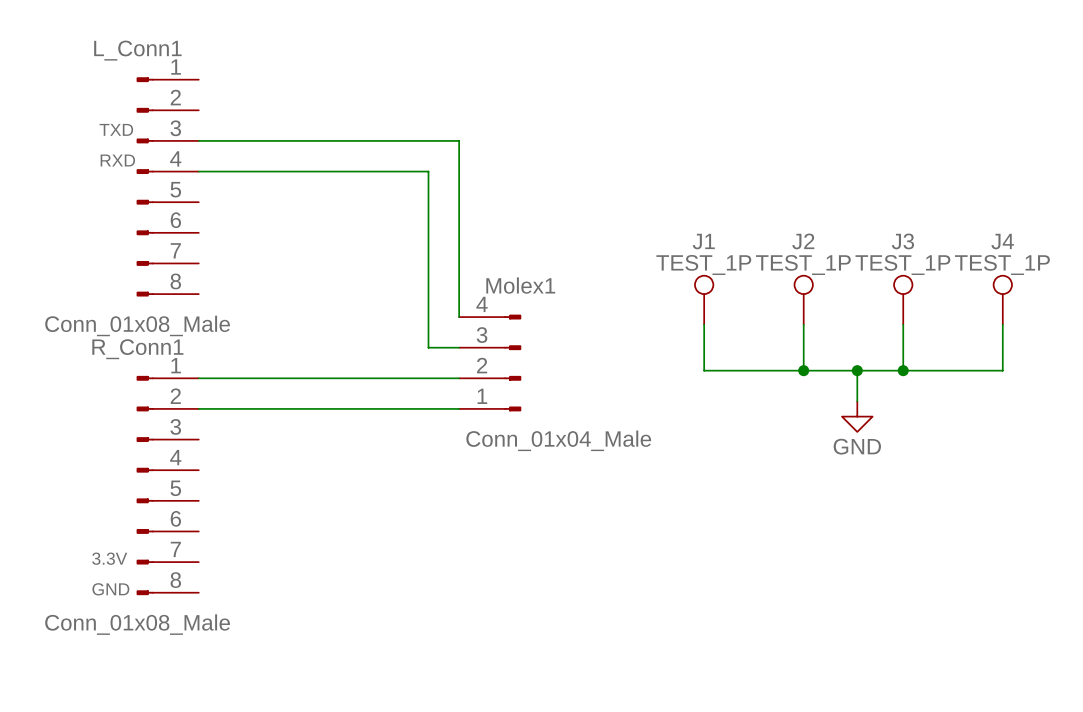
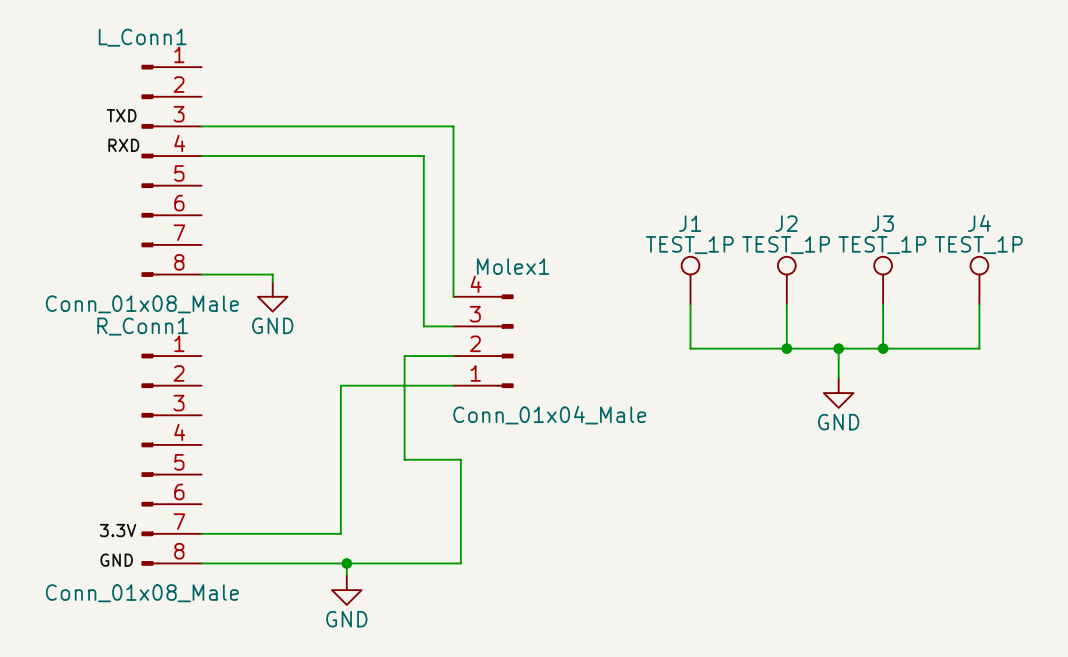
wire: none -> (201, 274) (272, 274) (272, 281)
power symbol: none -> GND (272, 296)
wire: (198, 378) (408, 378) -> (201, 563) (460, 563) (460, 459) (404, 459) (404, 356)
wire: (198, 408) (342, 408) -> (201, 533) (340, 533) (340, 385)
wire: none -> (346, 563) (346, 575)
junction: none -> (346, 563)
power symbol: none -> GND (346, 590)

